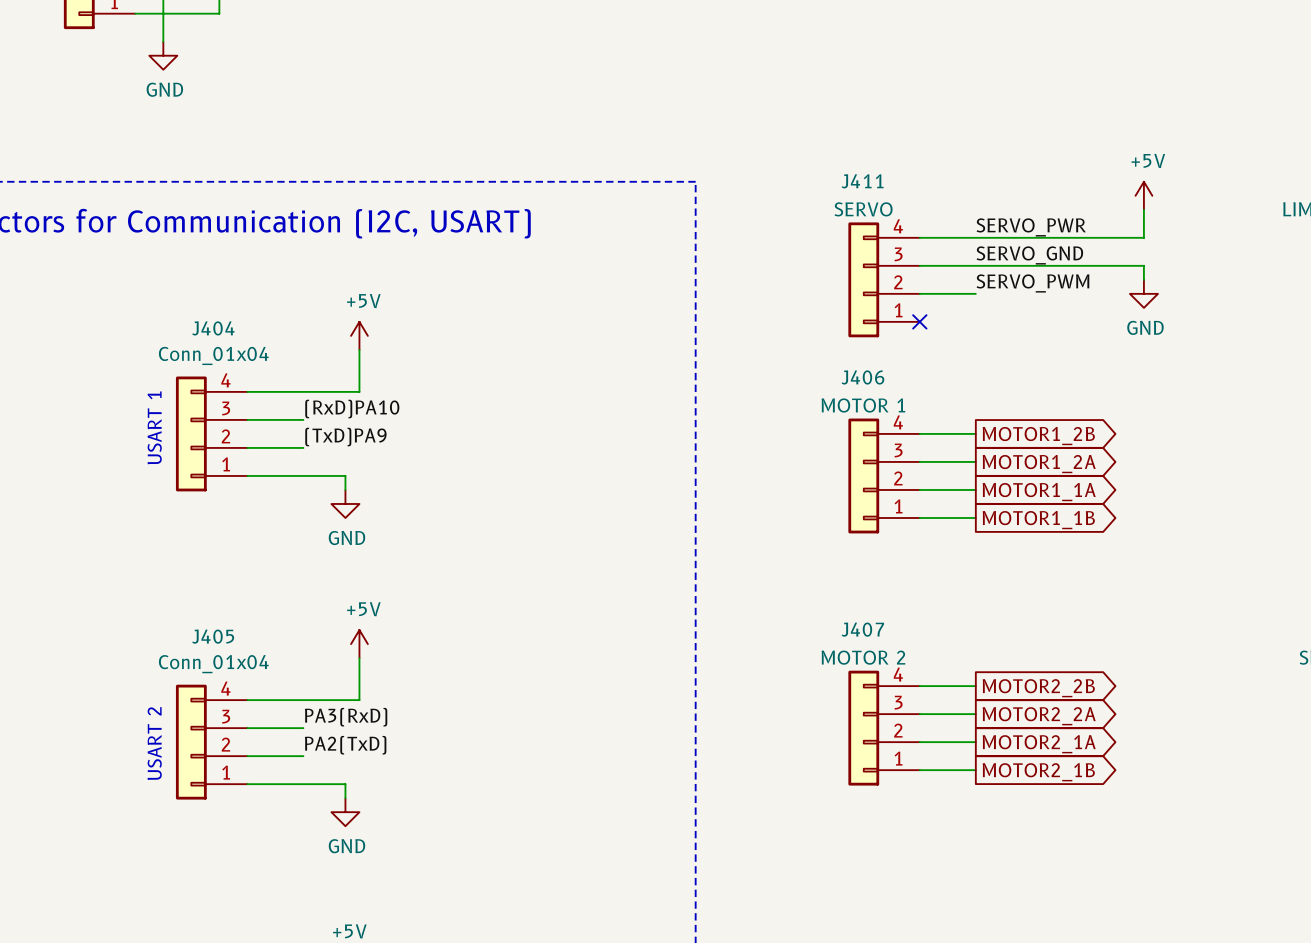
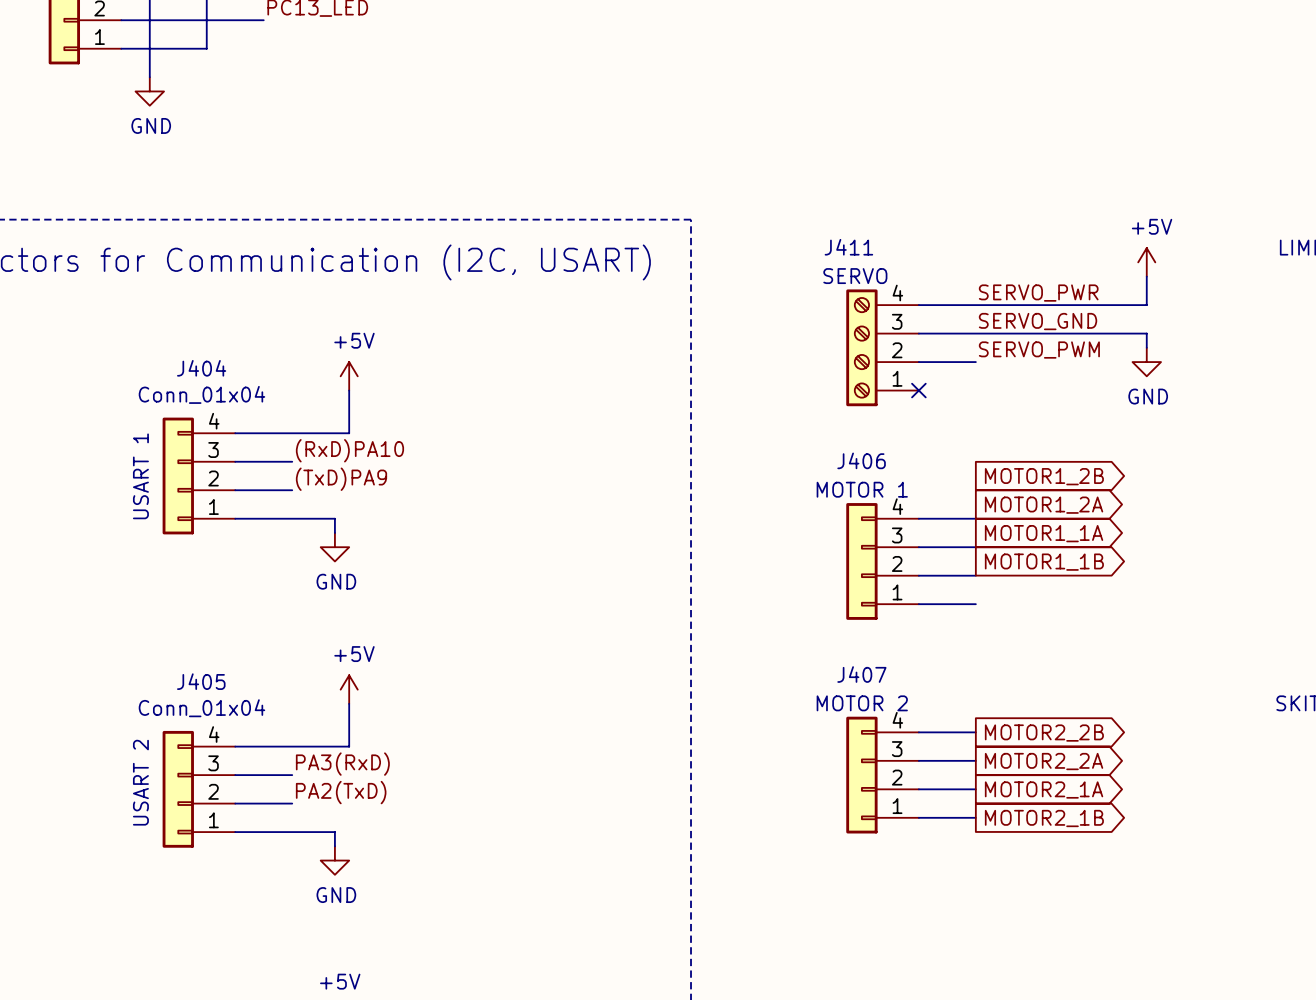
power symbol position: +5V (1143, 195) -> +5V (1146, 262)
wire: (1143, 209) (1143, 237) (919, 237) -> none
J411 symbol: [848, 222, 920, 338] -> [846, 289, 919, 407]
label: SERVO_PWR (1031, 227) -> none
label: SERVO_GND (1029, 255) -> SERVO_PWR (1038, 293)
wire: (1143, 265) (1143, 279) -> (1146, 305) (1146, 276)
label: SERVO_PWM (1032, 283) -> SERVO_GND (1038, 321)
wire: none -> (975, 333) (1146, 333) (1146, 347)
power symbol position: GND (1143, 293) -> GND (1146, 362)
label: none -> SERVO_PWM (1039, 350)
wire: none -> (918, 362) (975, 362)
no-connect mark position: (919, 321) -> (918, 390)
wire: (919, 433) (975, 433) -> (918, 518) (975, 518)
wire: (919, 461) (975, 461) -> (918, 547) (975, 547)
J406 position: (884, 475) -> (882, 561)
wire: (919, 489) (975, 489) -> (918, 575) (975, 575)
wire: (919, 518) (975, 518) -> (918, 604) (975, 604)

